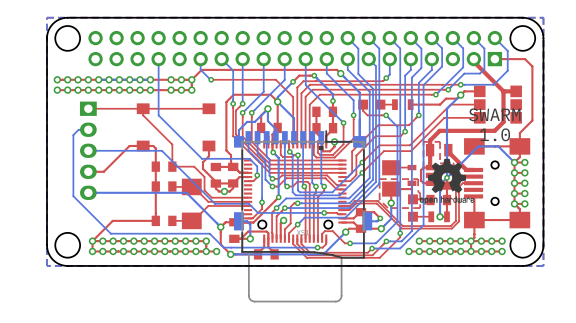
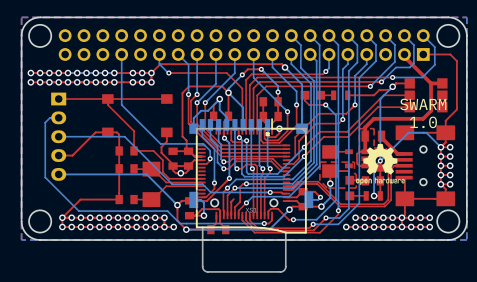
via: (283, 220) -> none

